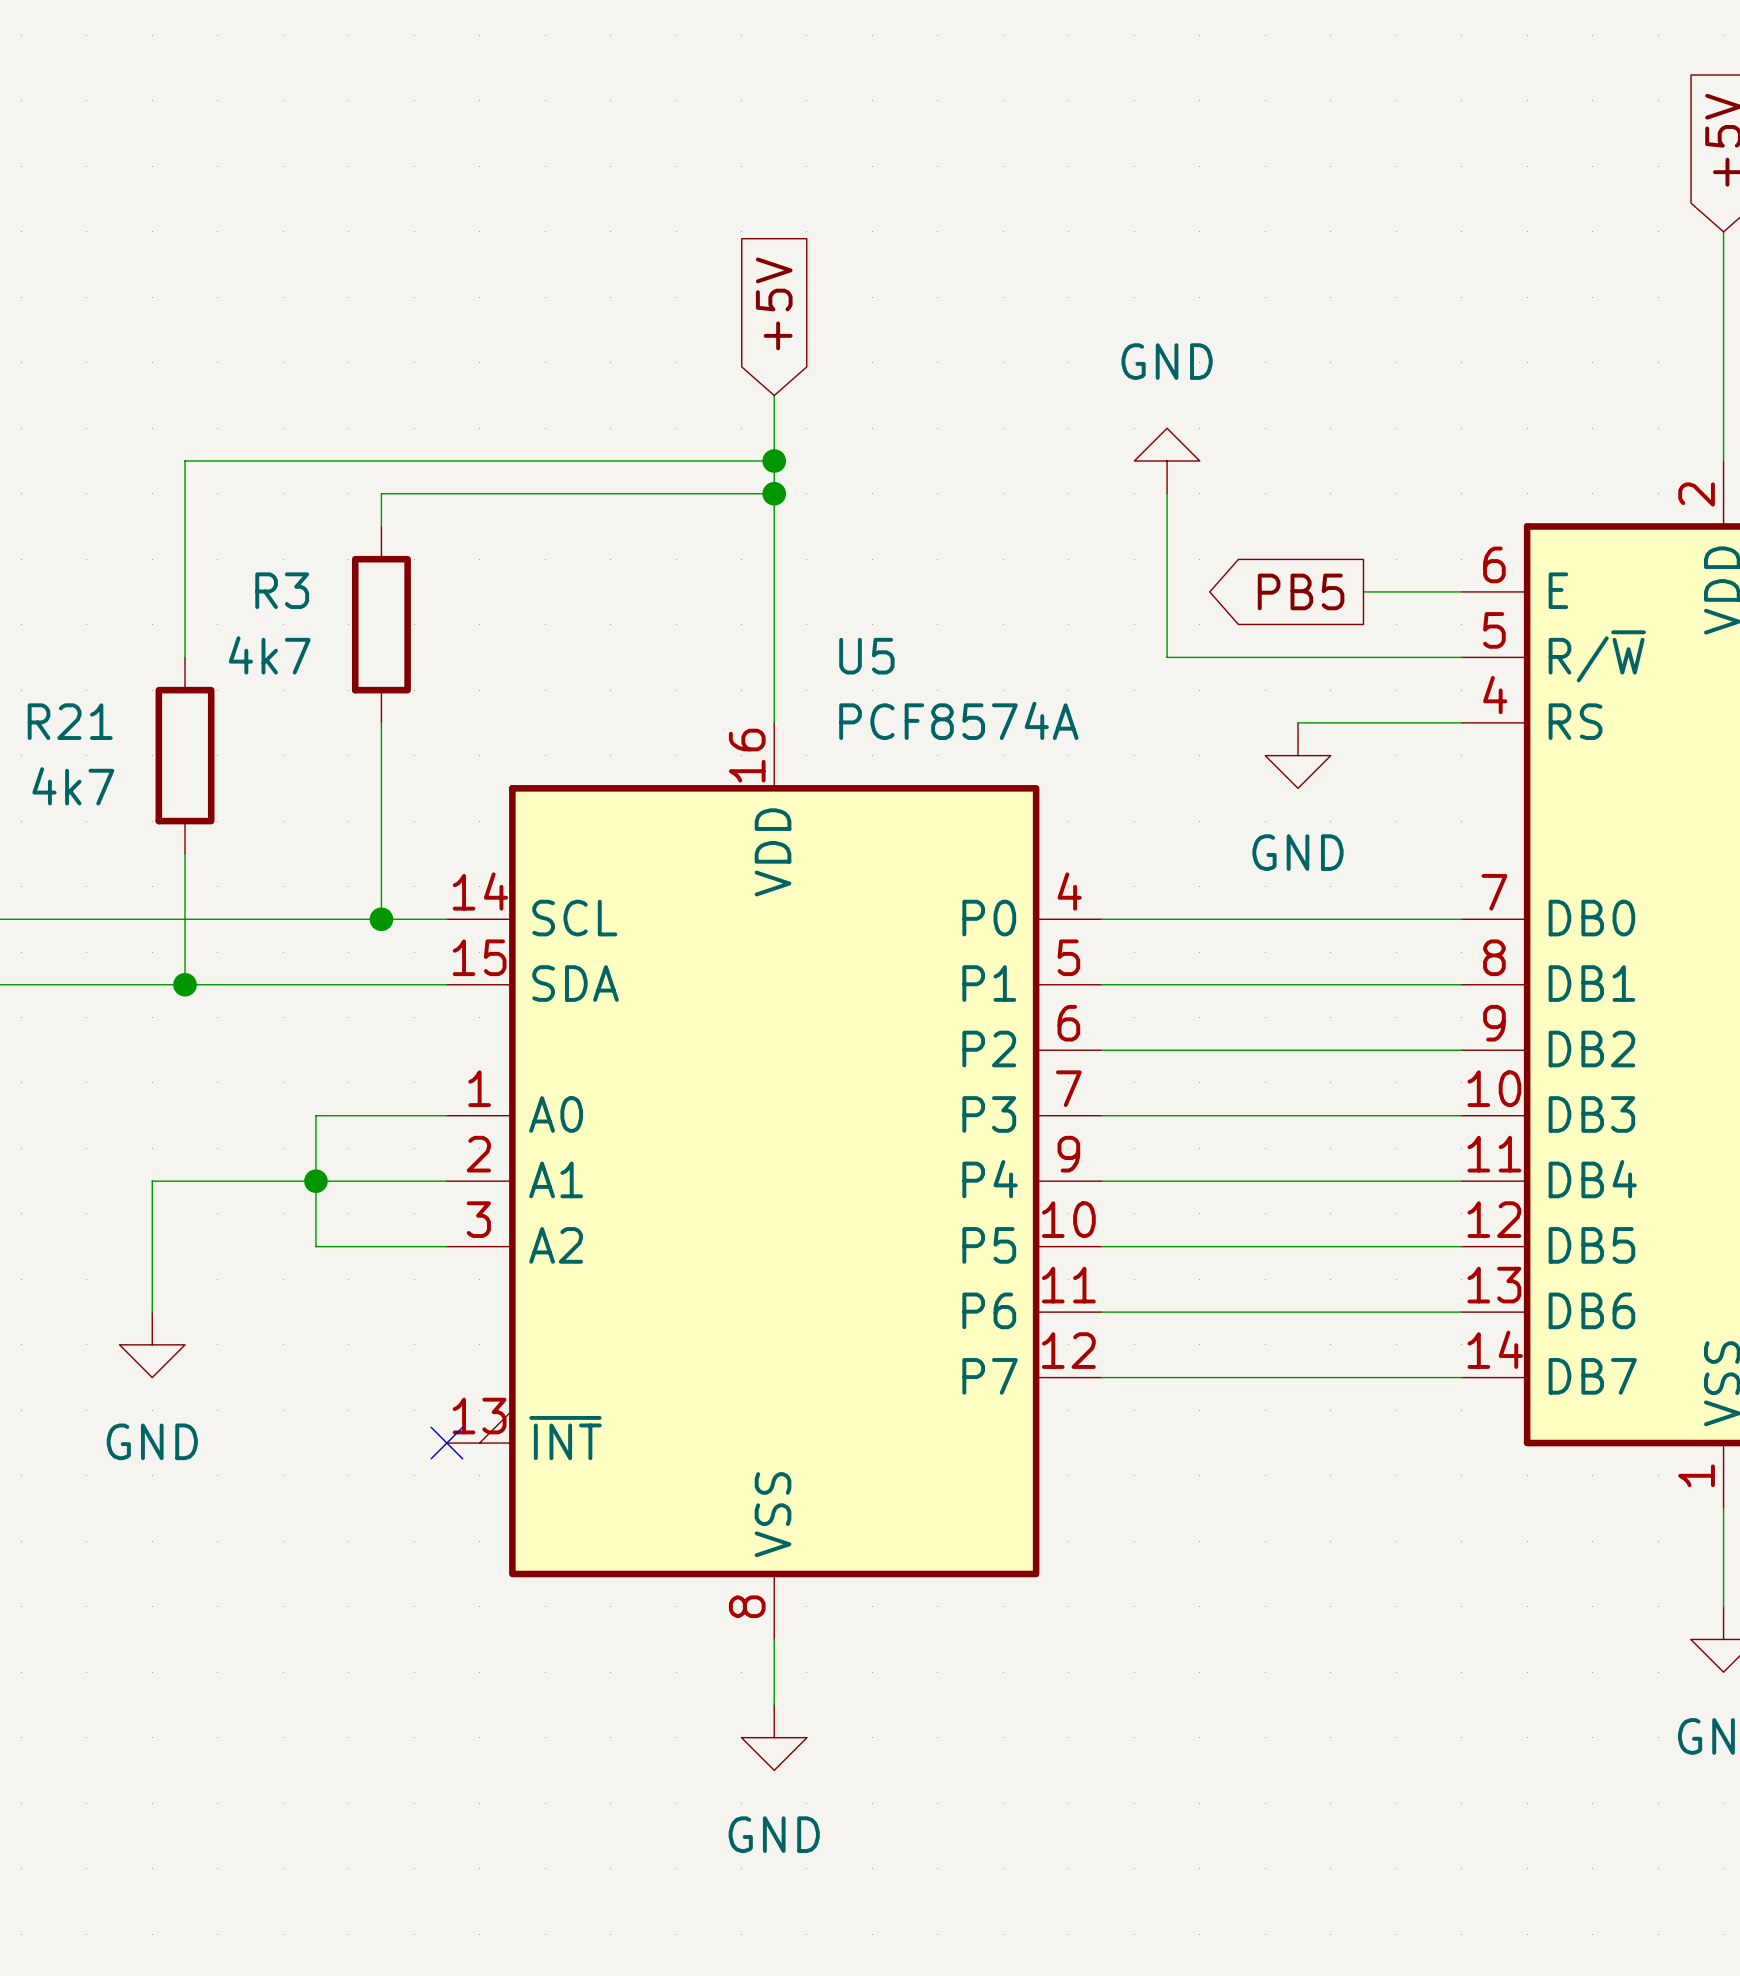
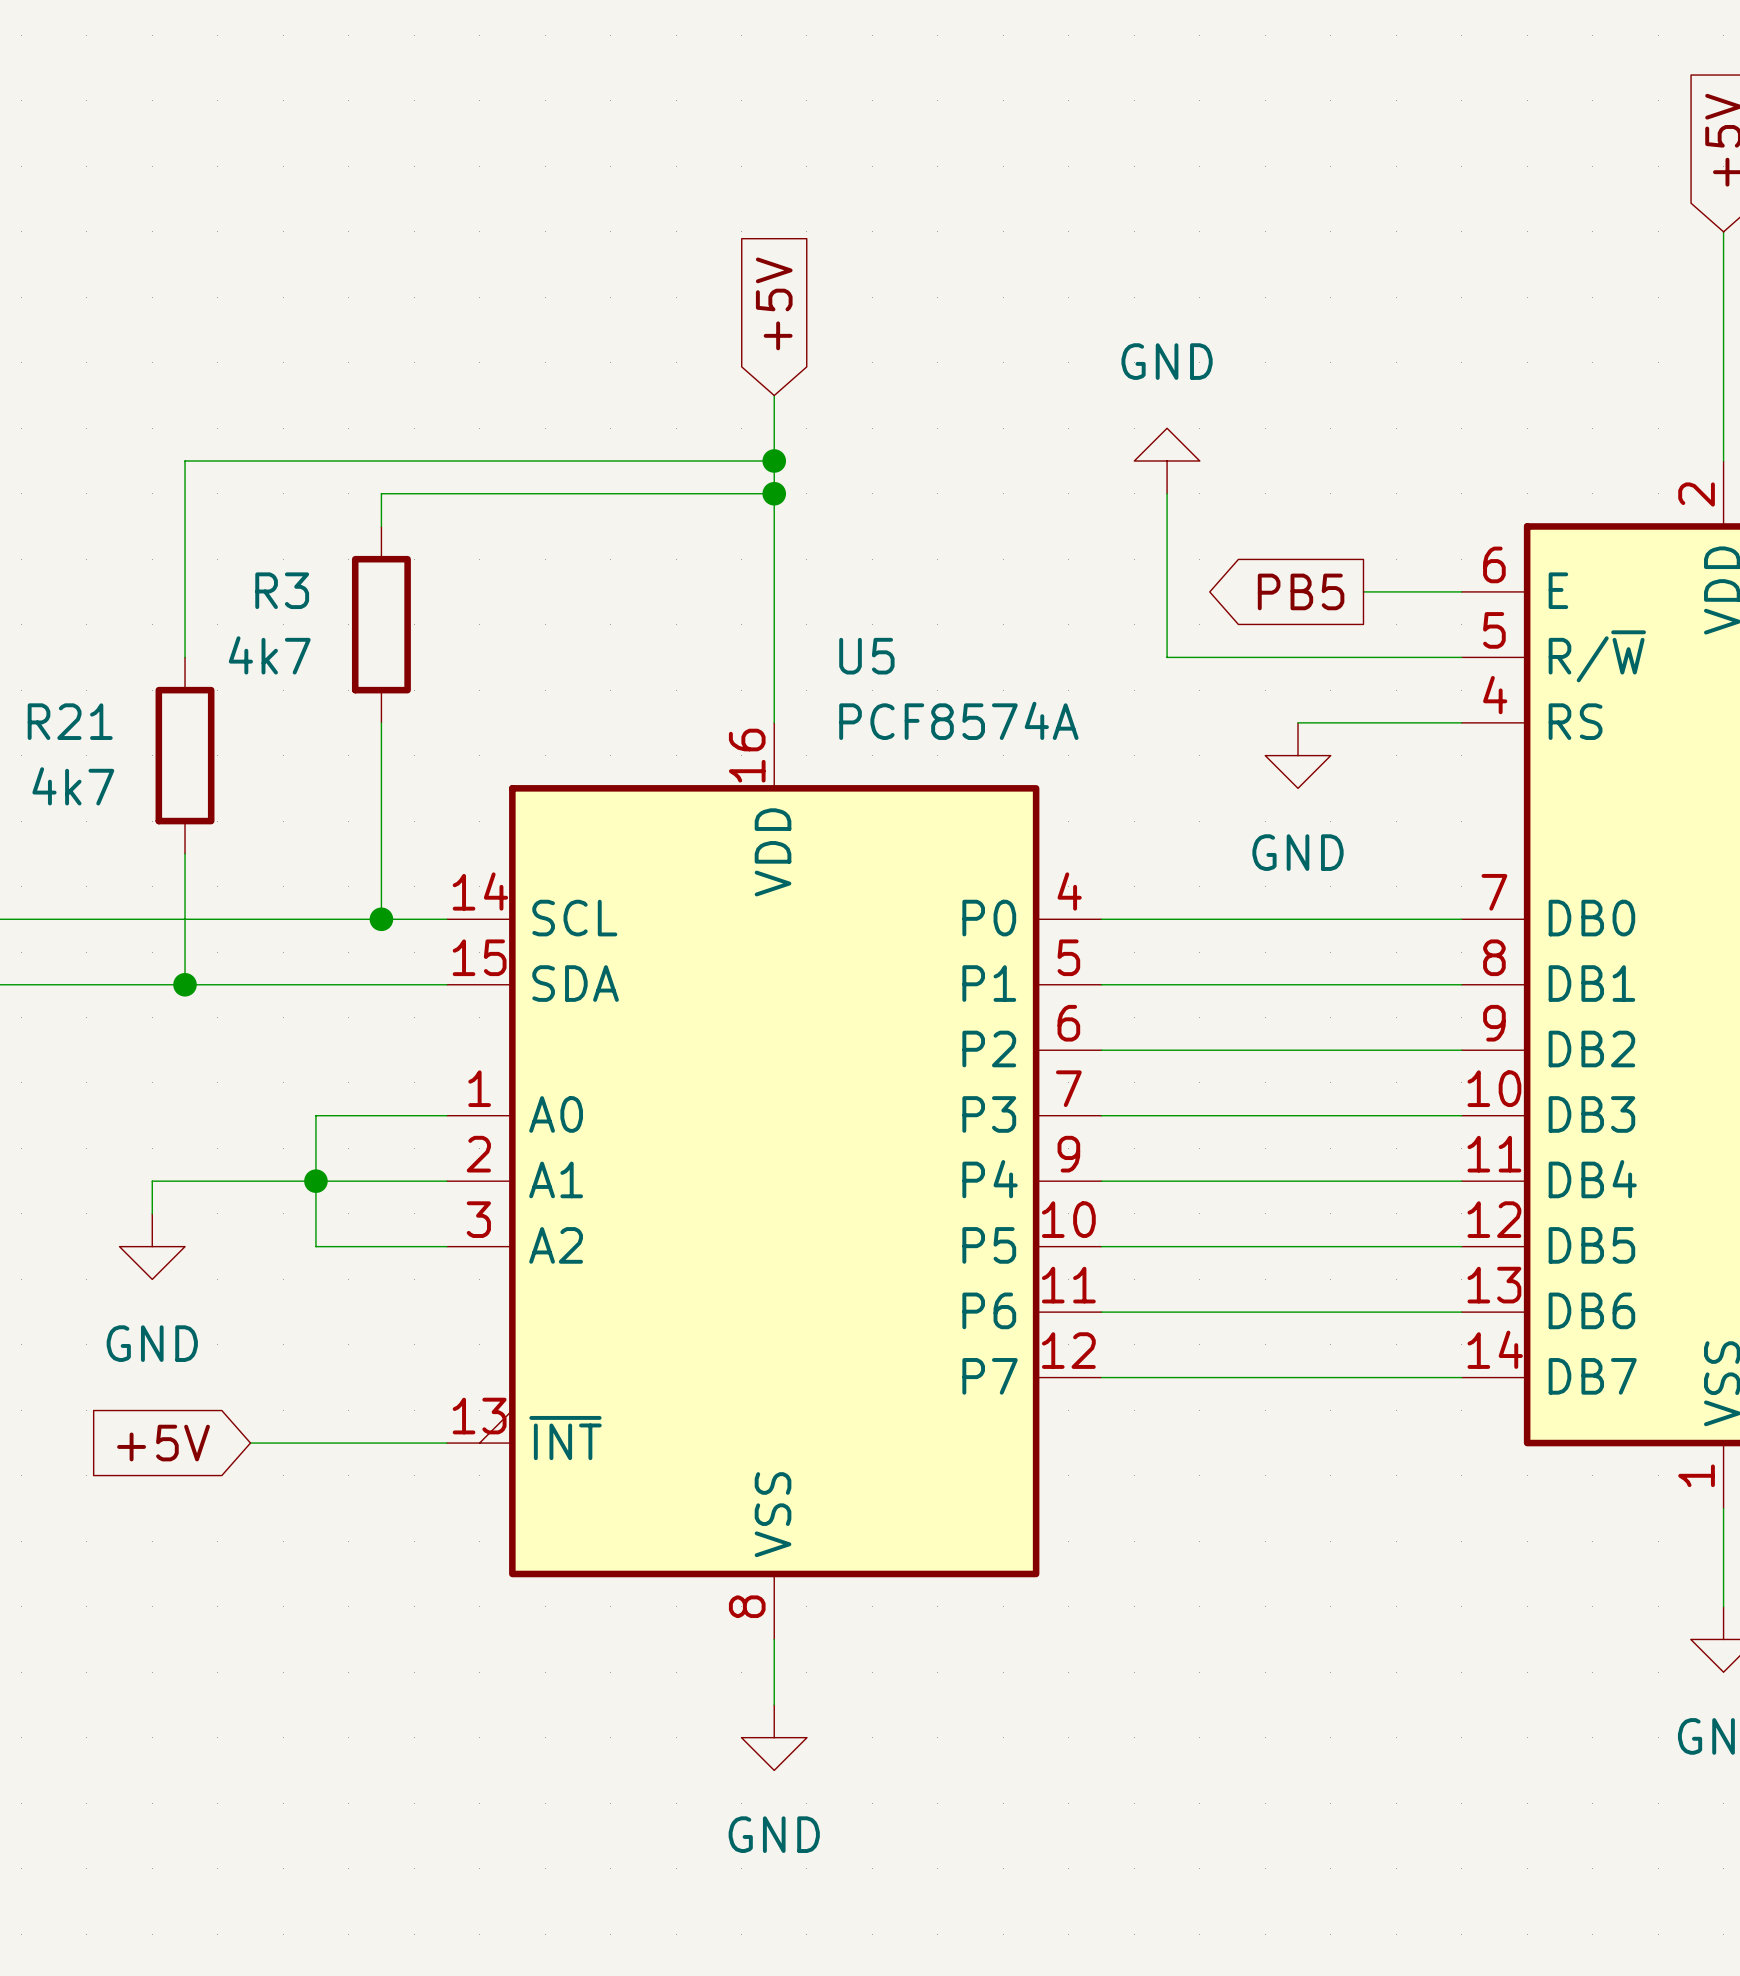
wire: (152, 1213) (152, 1312) -> none
power symbol position: GND (152, 1344) -> GND (152, 1246)
global label: none -> +5V (163, 1443)
wire: none -> (250, 1443) (446, 1443)
no-connect mark: (446, 1443) -> none

